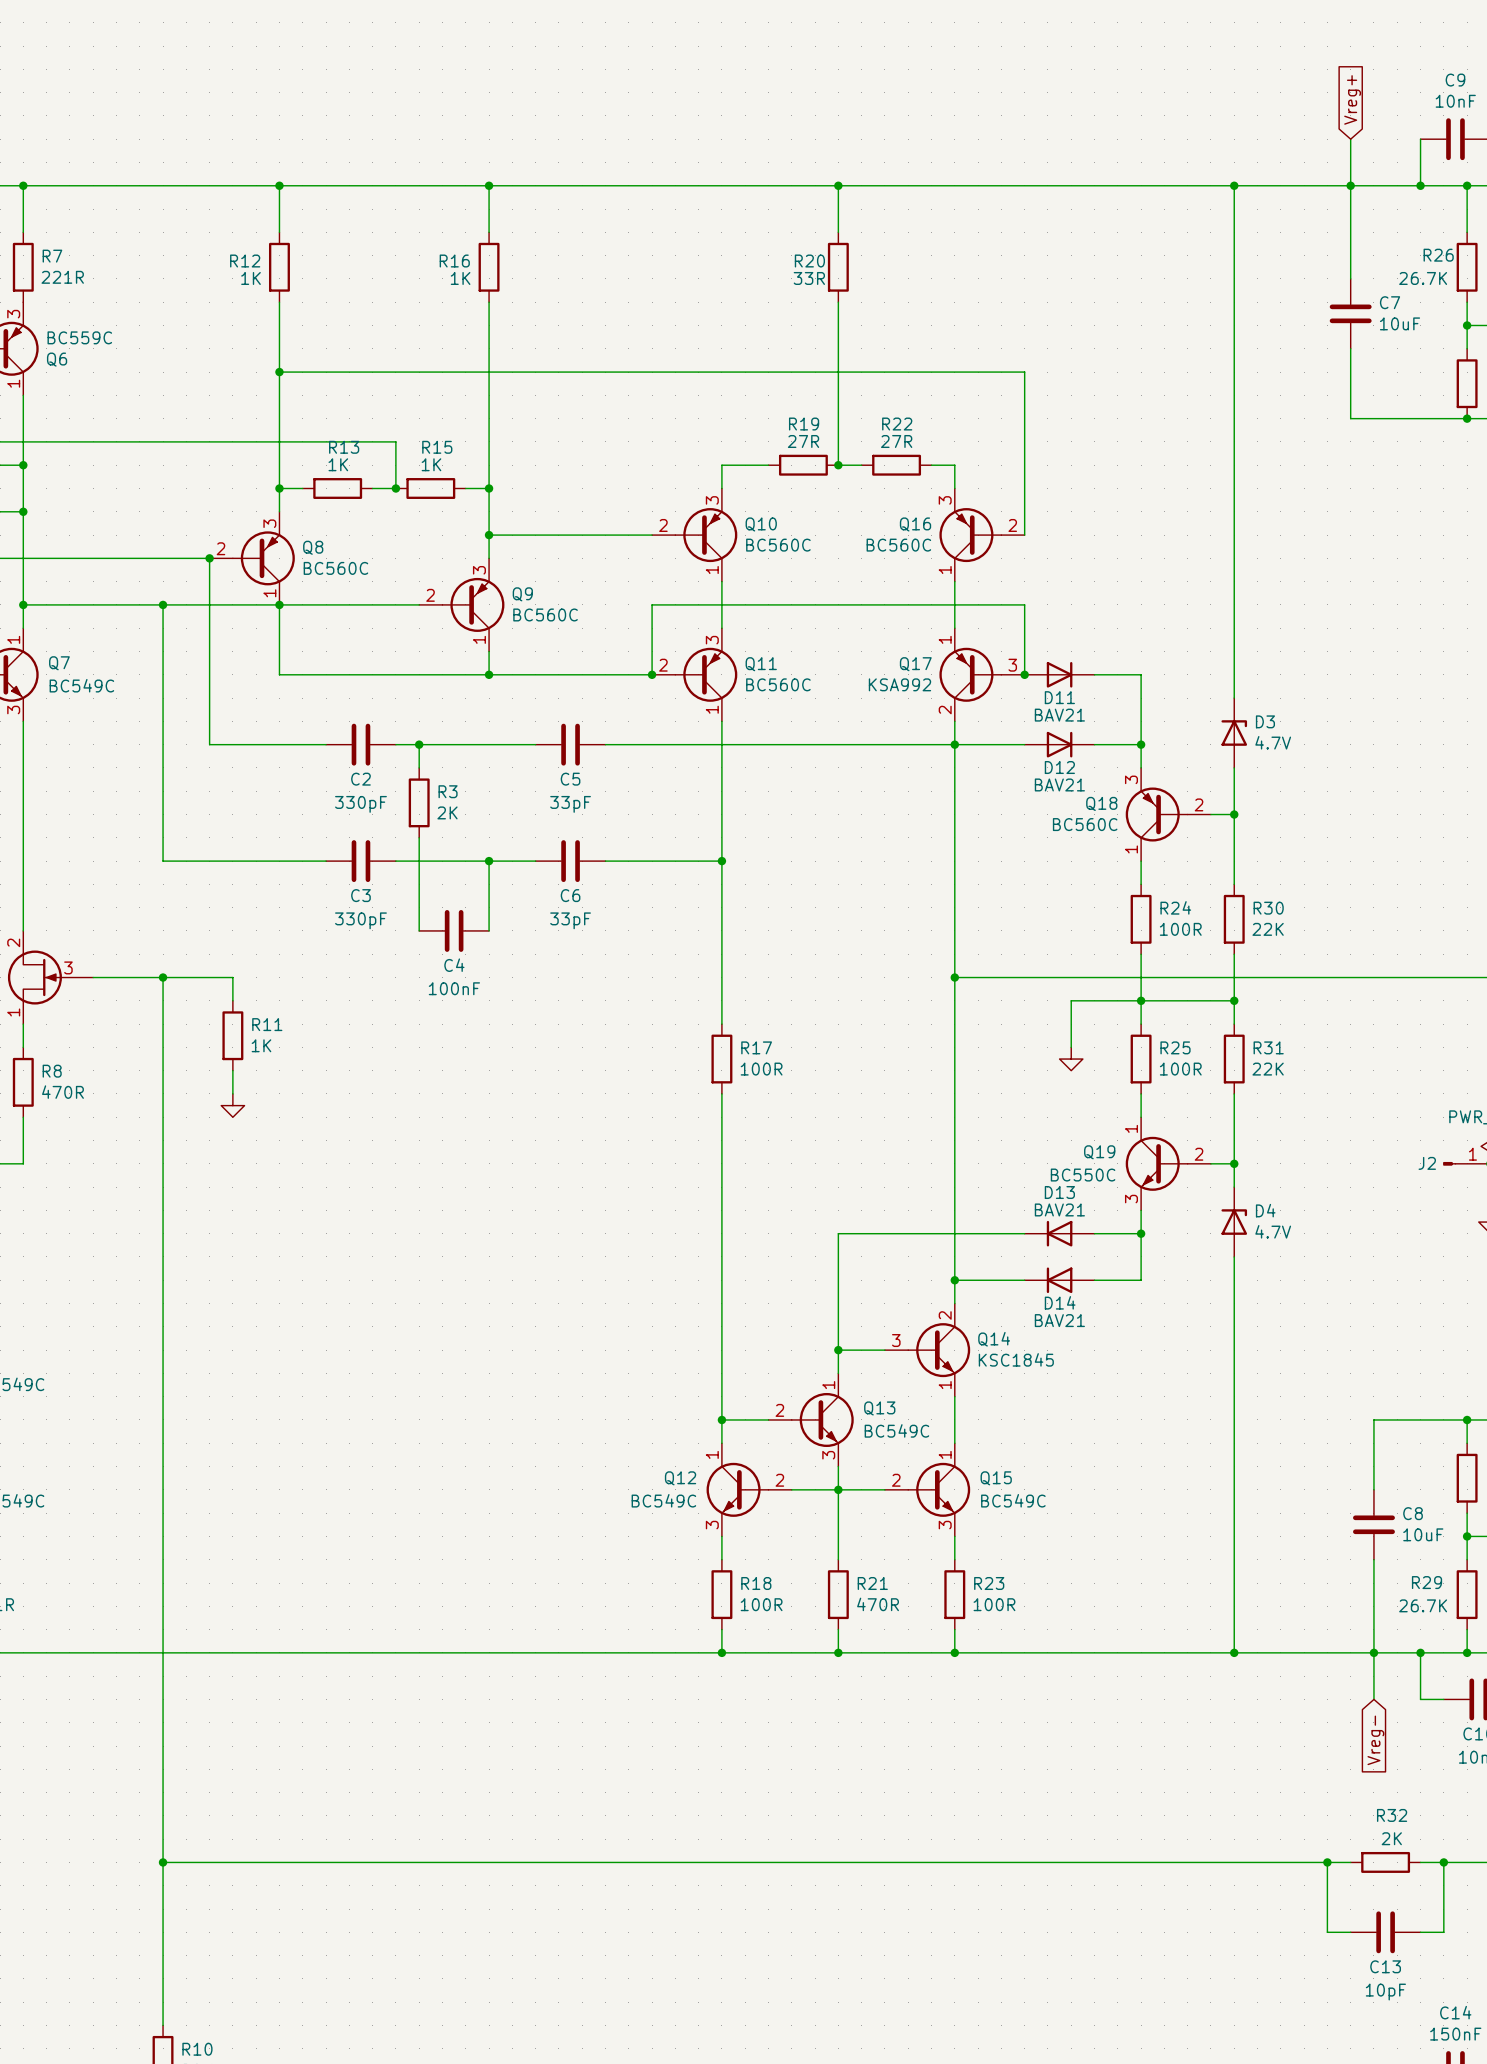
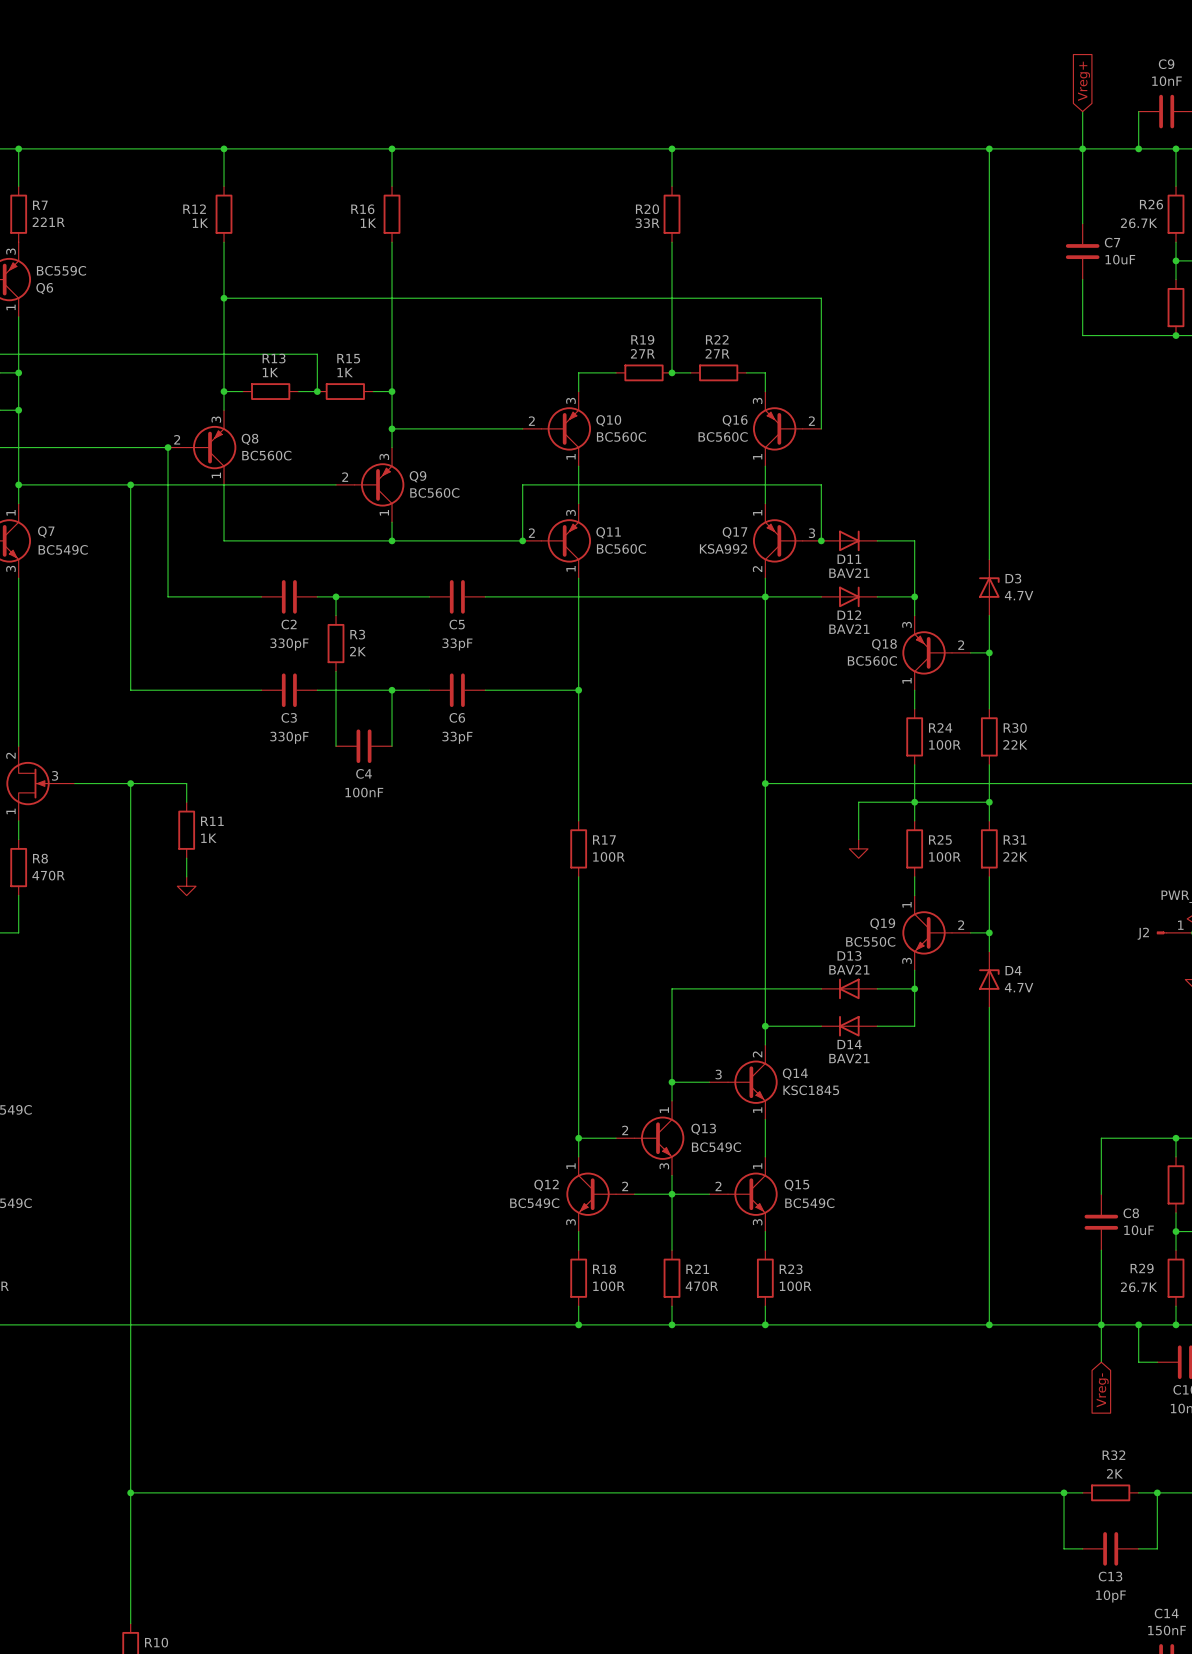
junction: (279, 604) -> none

